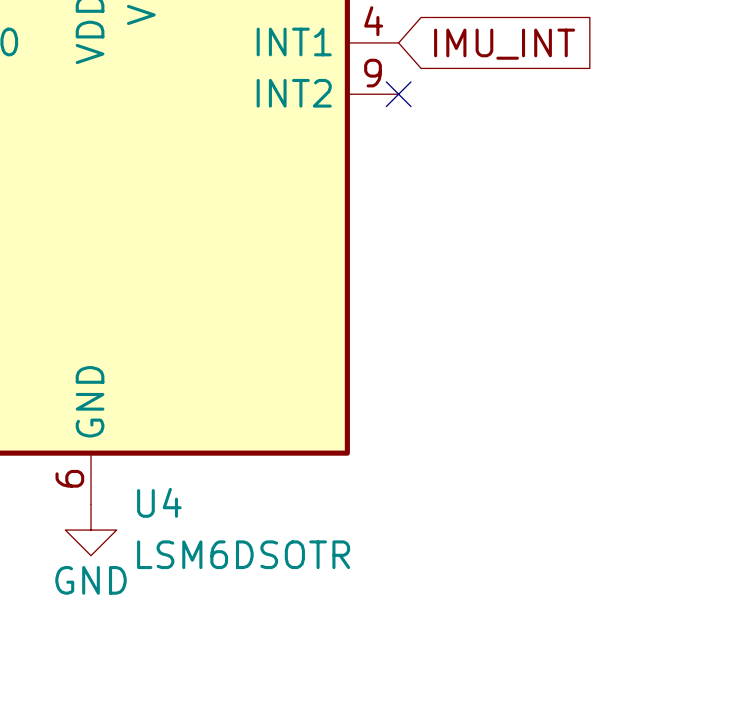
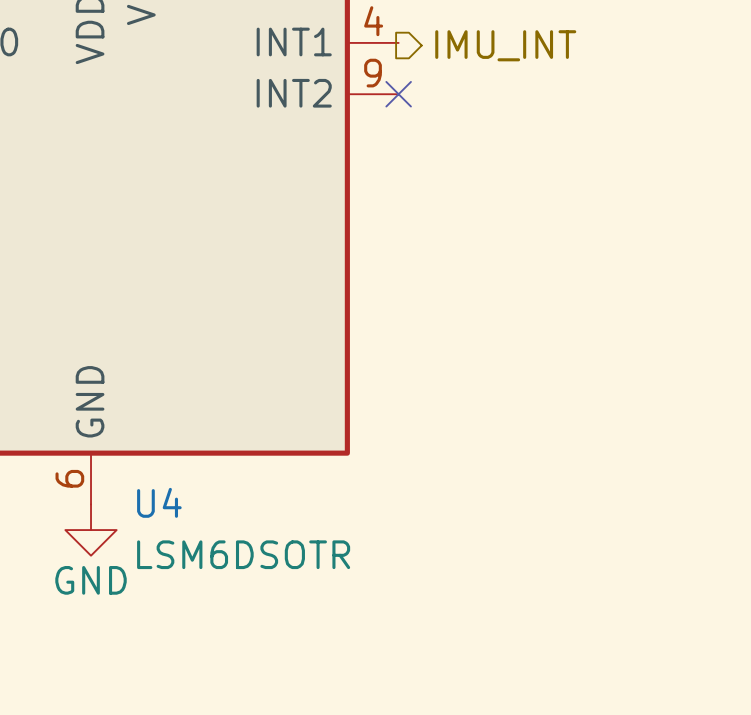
global label: IMU_INT (504, 44) -> none
hierarchical label: none -> IMU_INT (505, 45)

